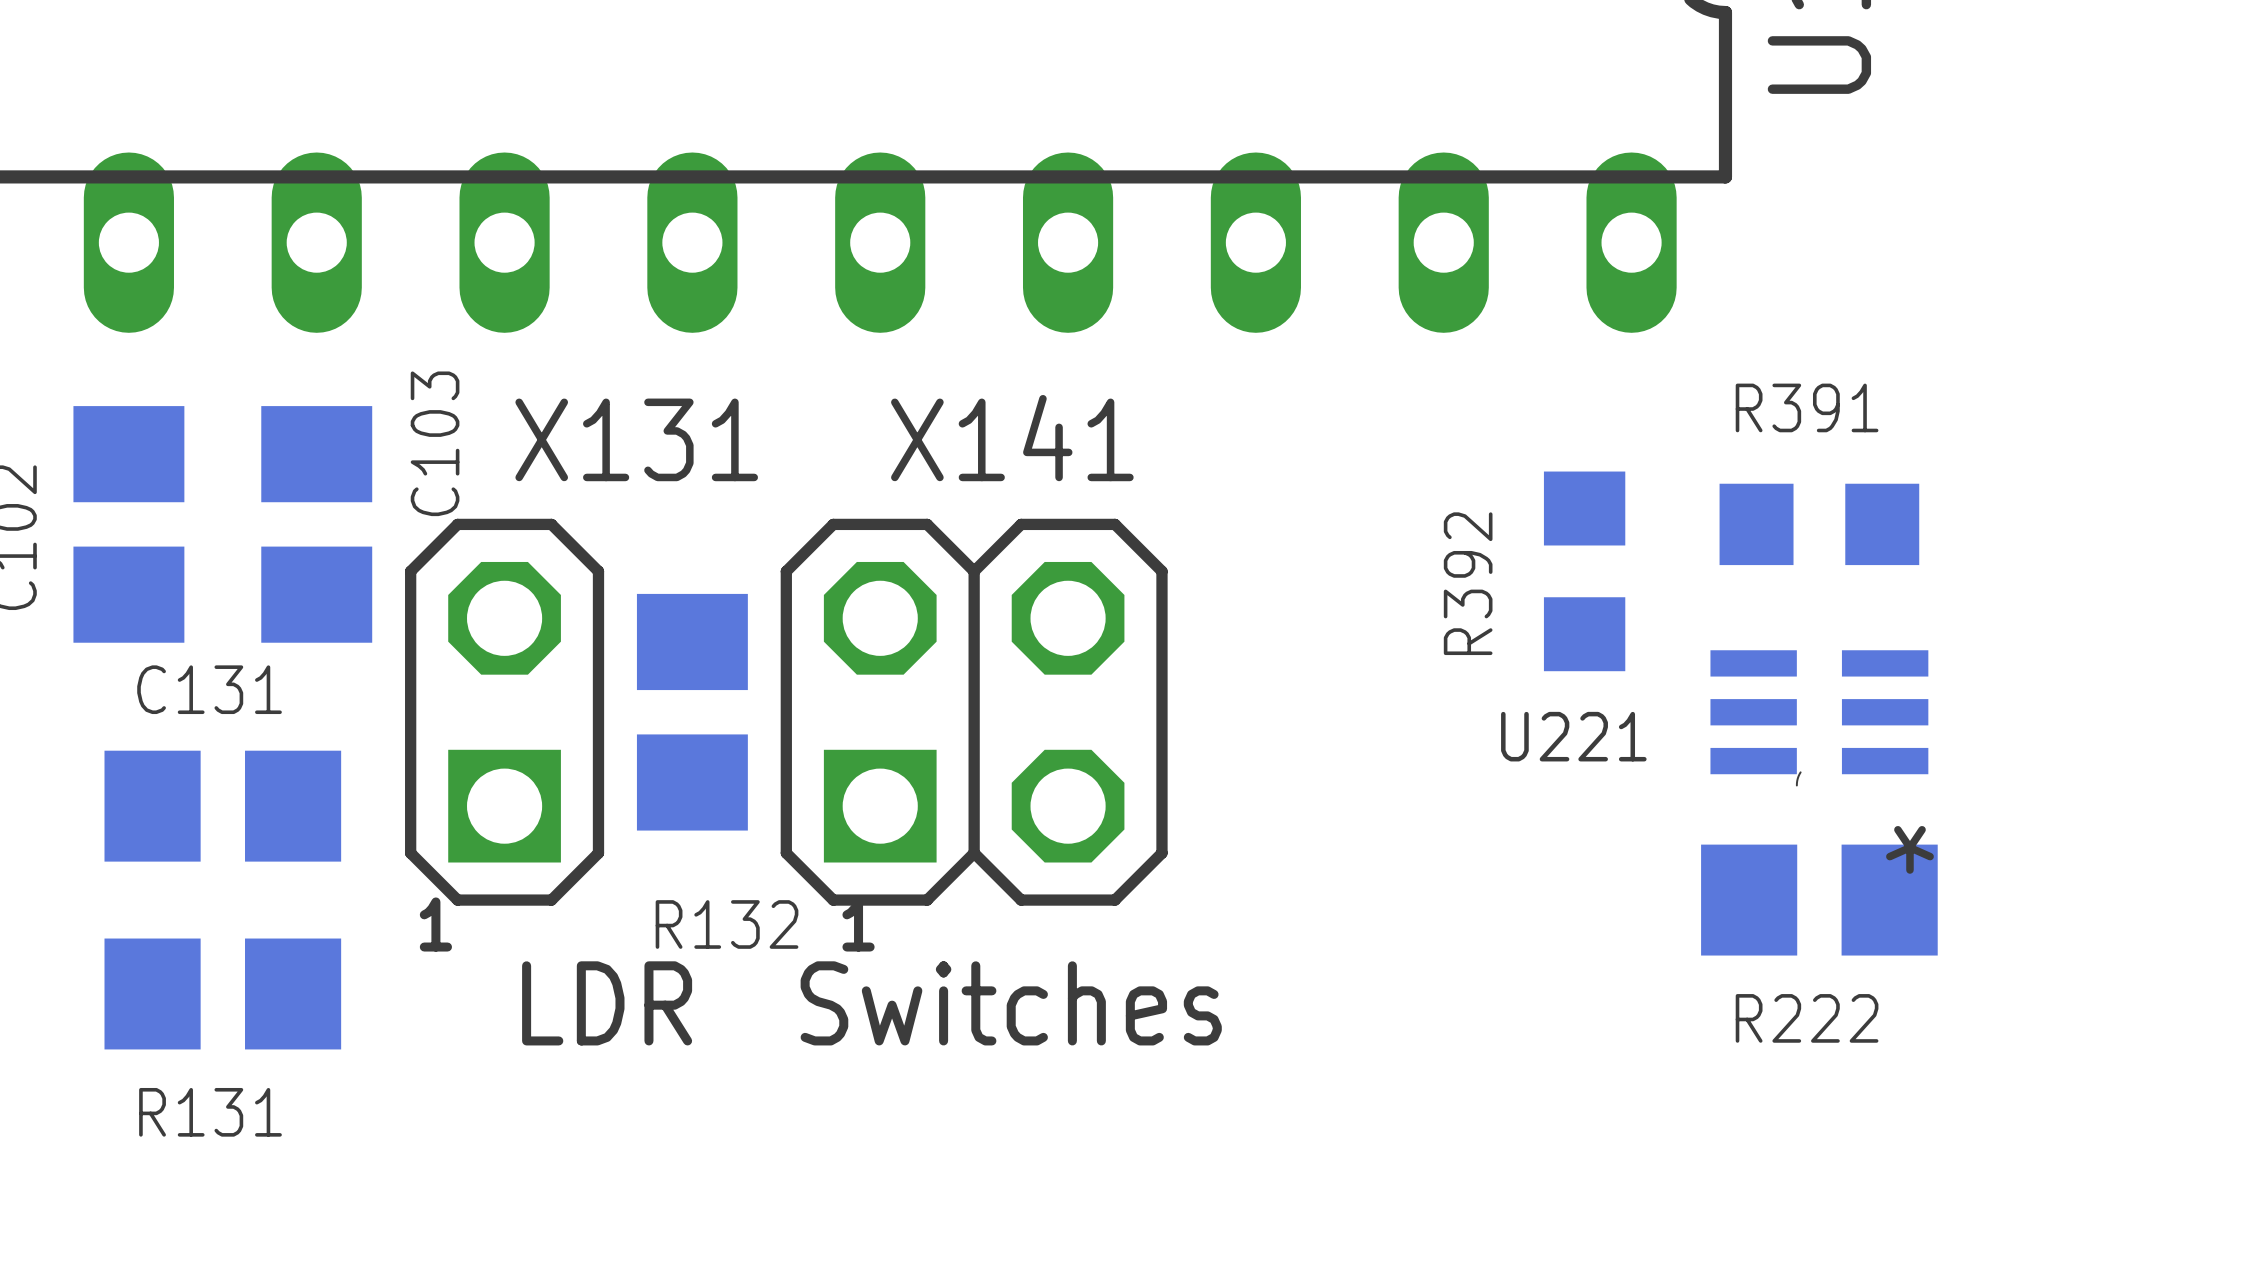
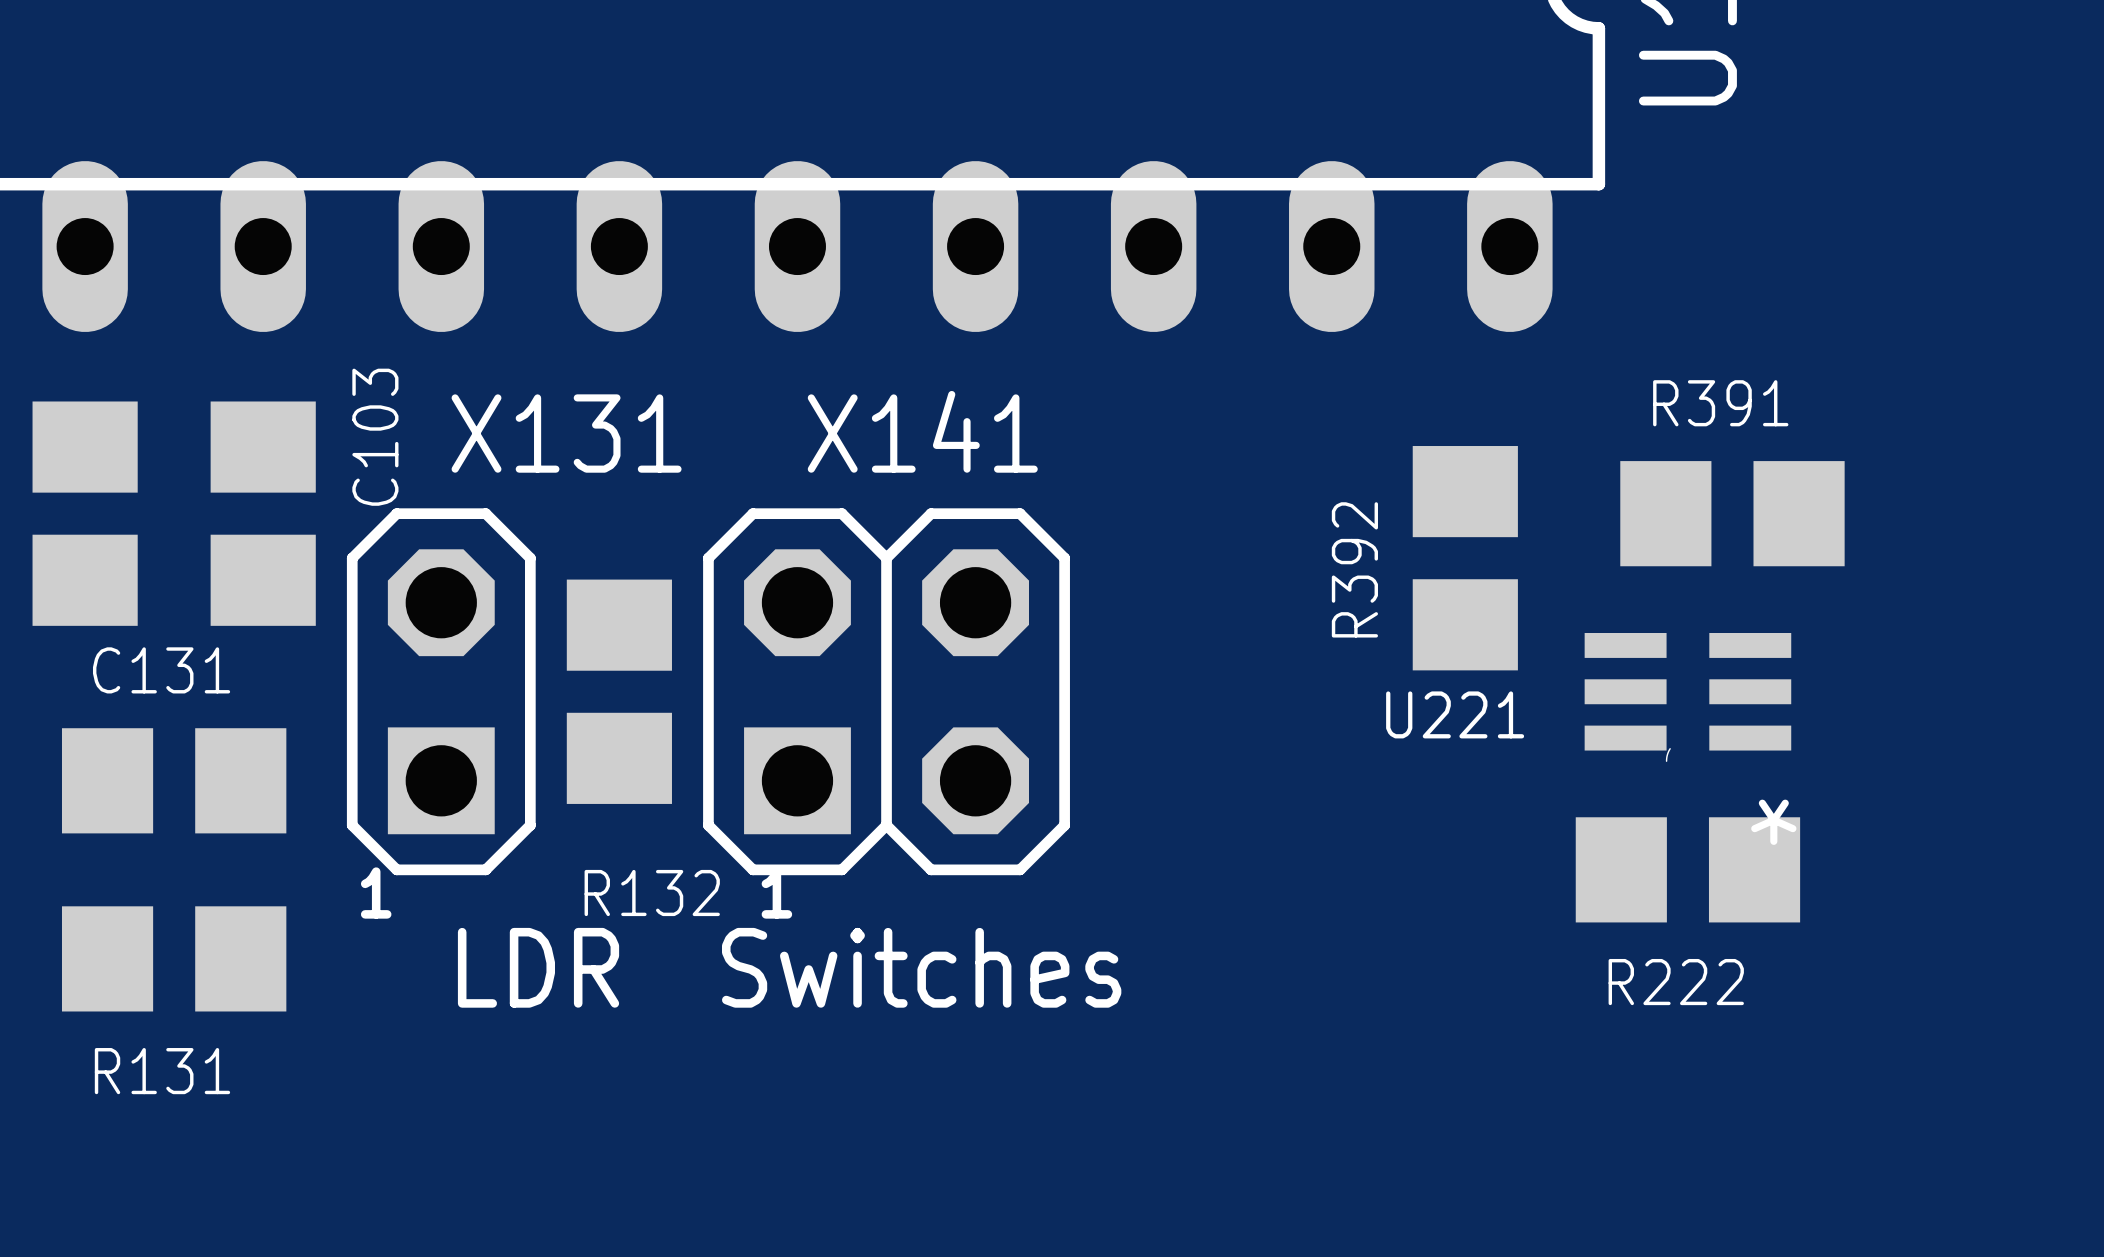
R391 name position: R391 (1807, 407) -> R391 (1720, 403)
R392 footprint: [1543, 471, 1626, 672] -> [1412, 446, 1518, 671]
R391 footprint: [1719, 483, 1920, 566] -> [1620, 461, 1845, 567]

